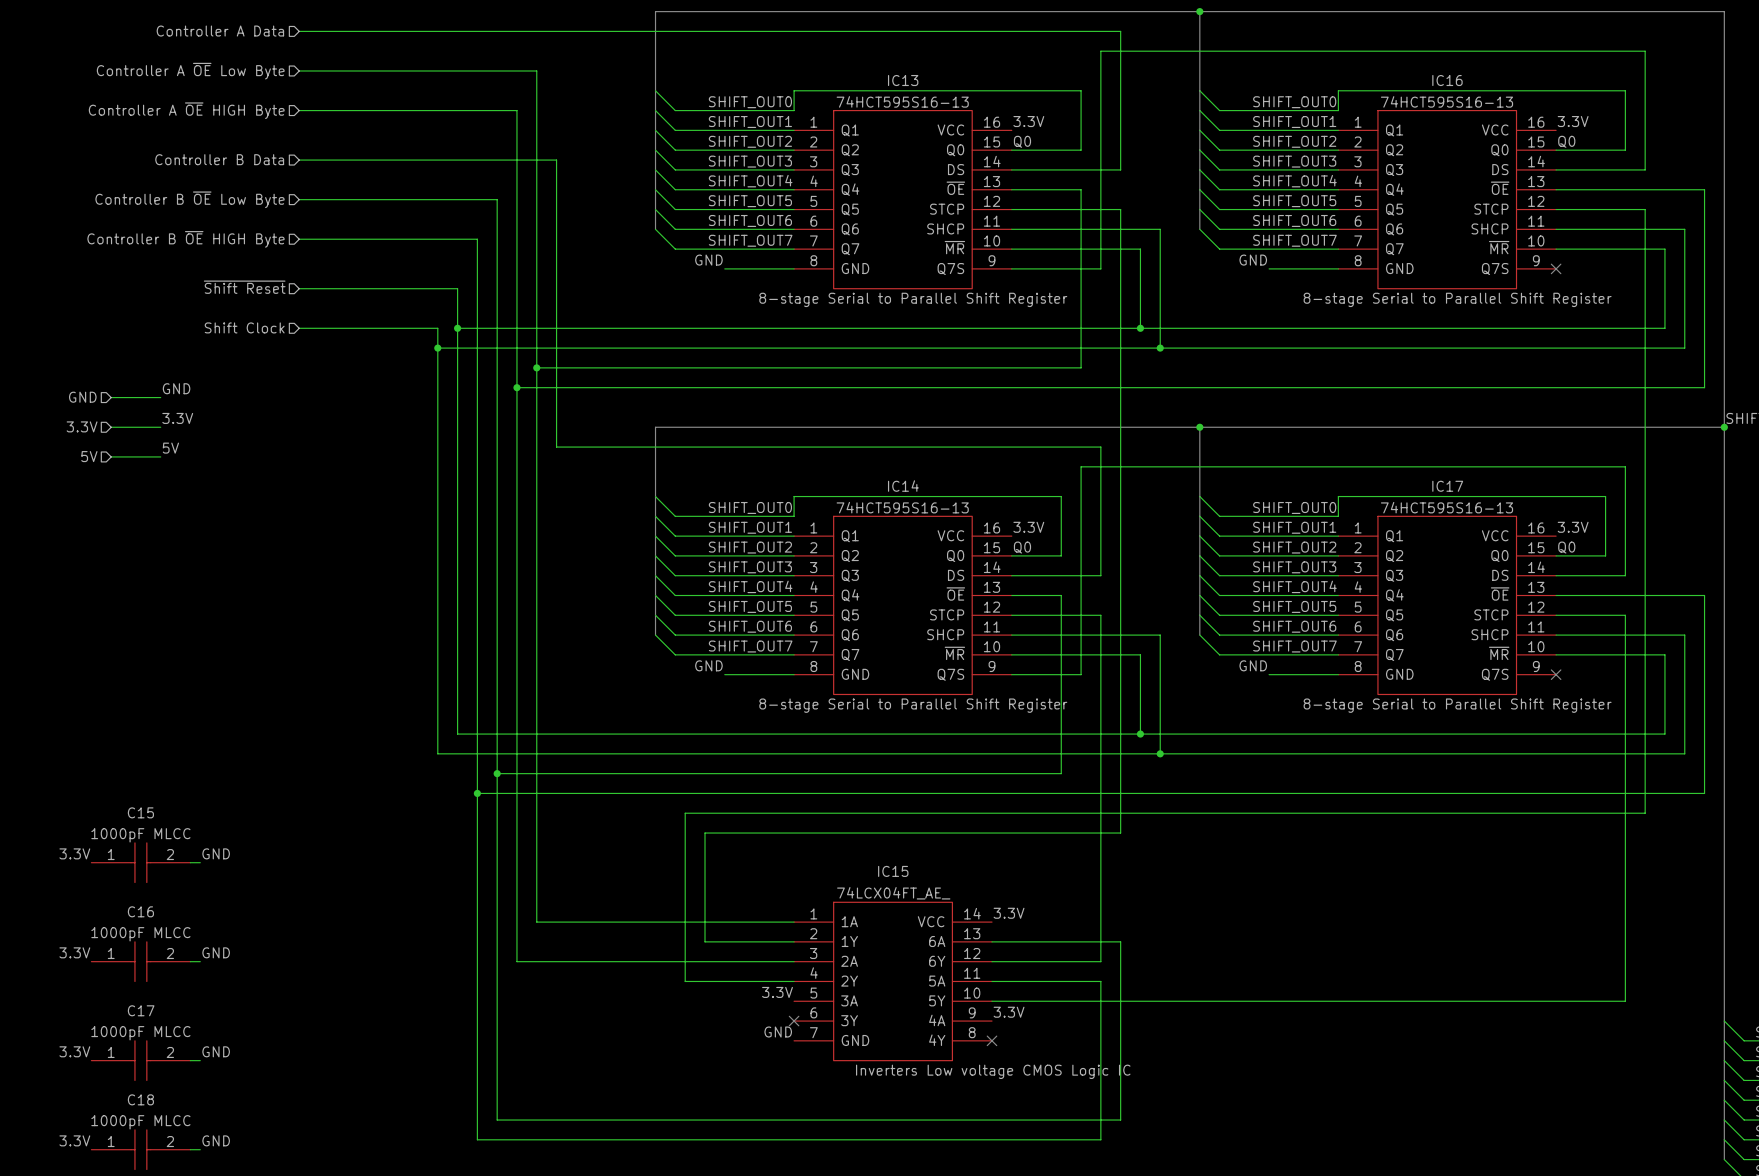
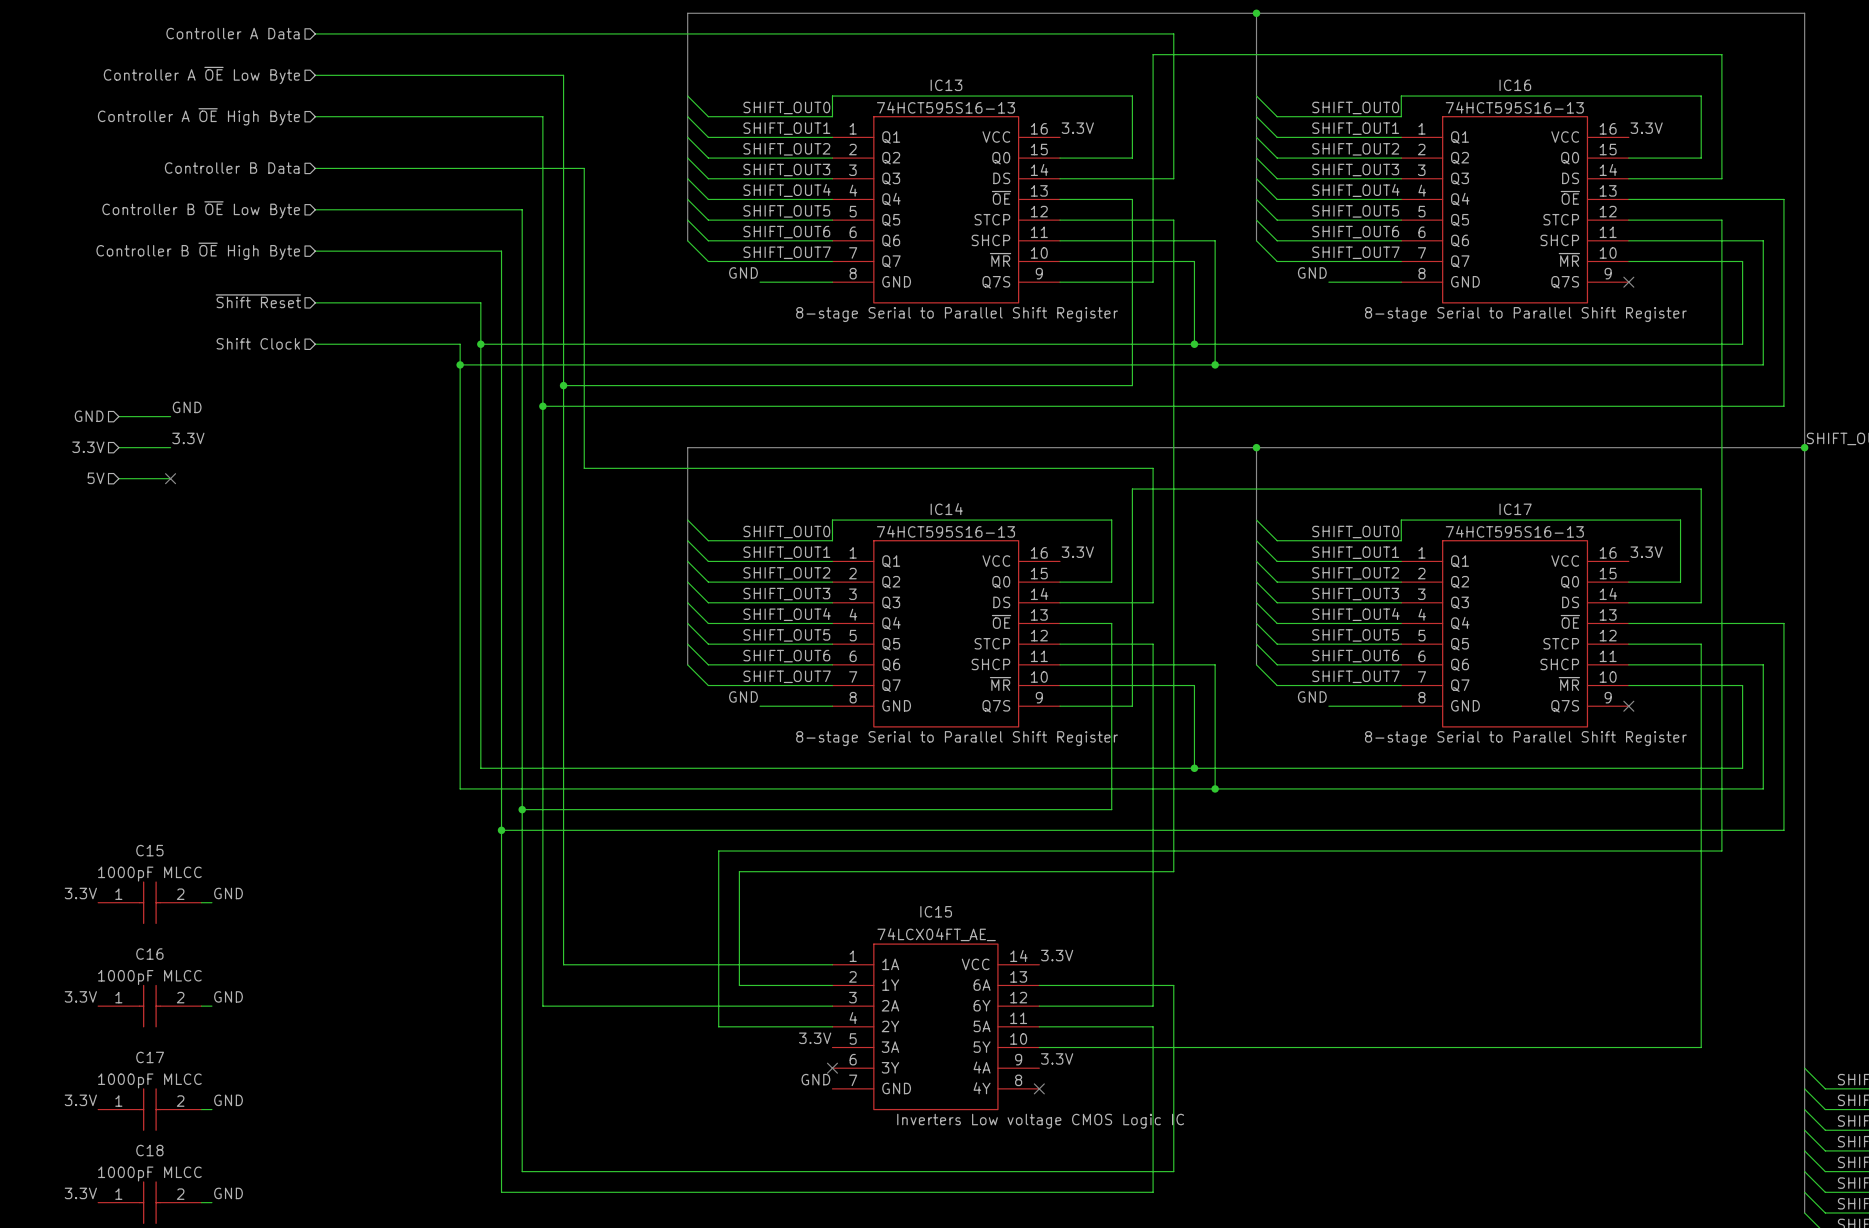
hierarchical label: Controller A ~{OE} HIGH Byte (186, 110) -> Controller A ~{OE} High Byte (198, 116)
label: Q0 (1022, 141) -> none
label: Q0 (1566, 141) -> none
hierarchical label: Controller B ~{OE} HIGH Byte (185, 239) -> Controller B ~{OE} High Byte (198, 251)
label: 5V (170, 448) -> none
no-connect mark: none -> (170, 478)
label: Q0 (1022, 547) -> none
label: Q0 (1566, 547) -> none

